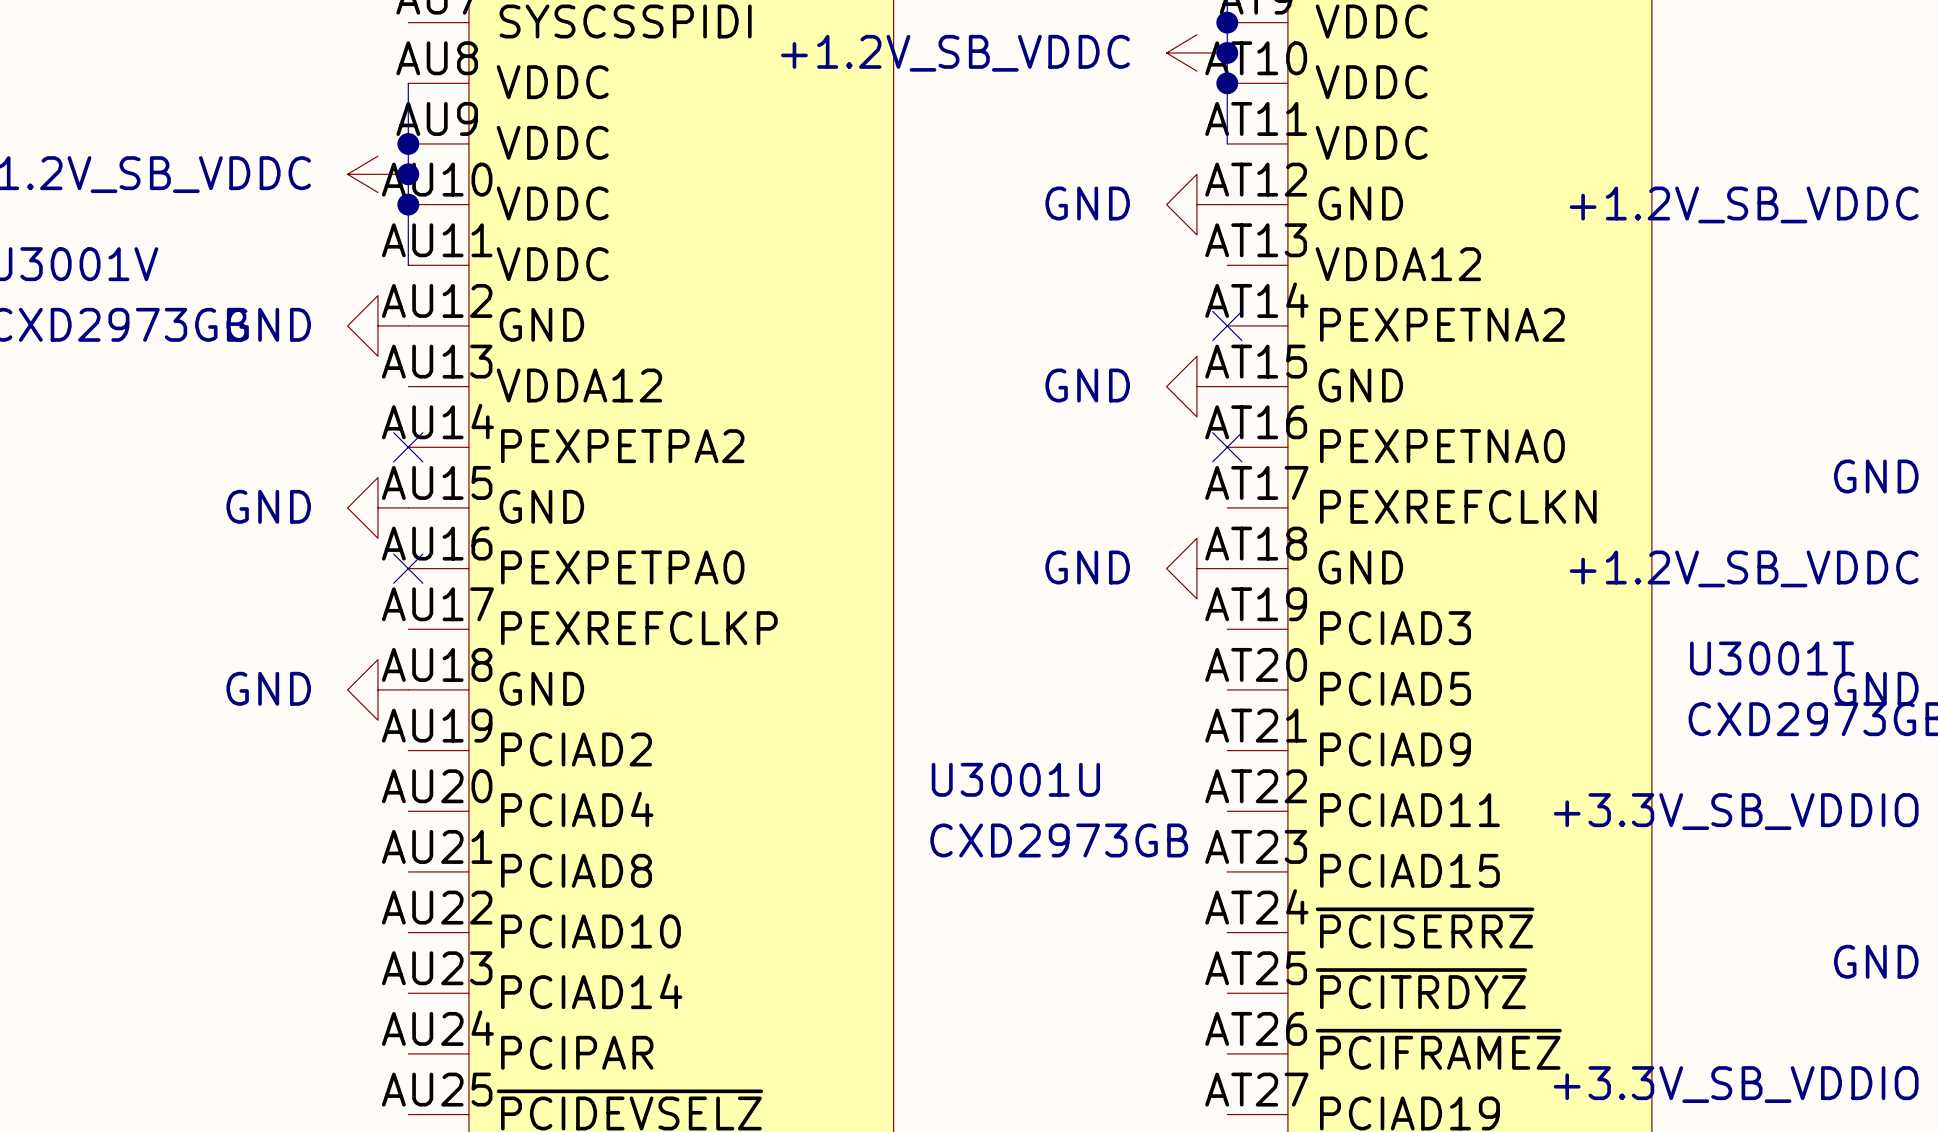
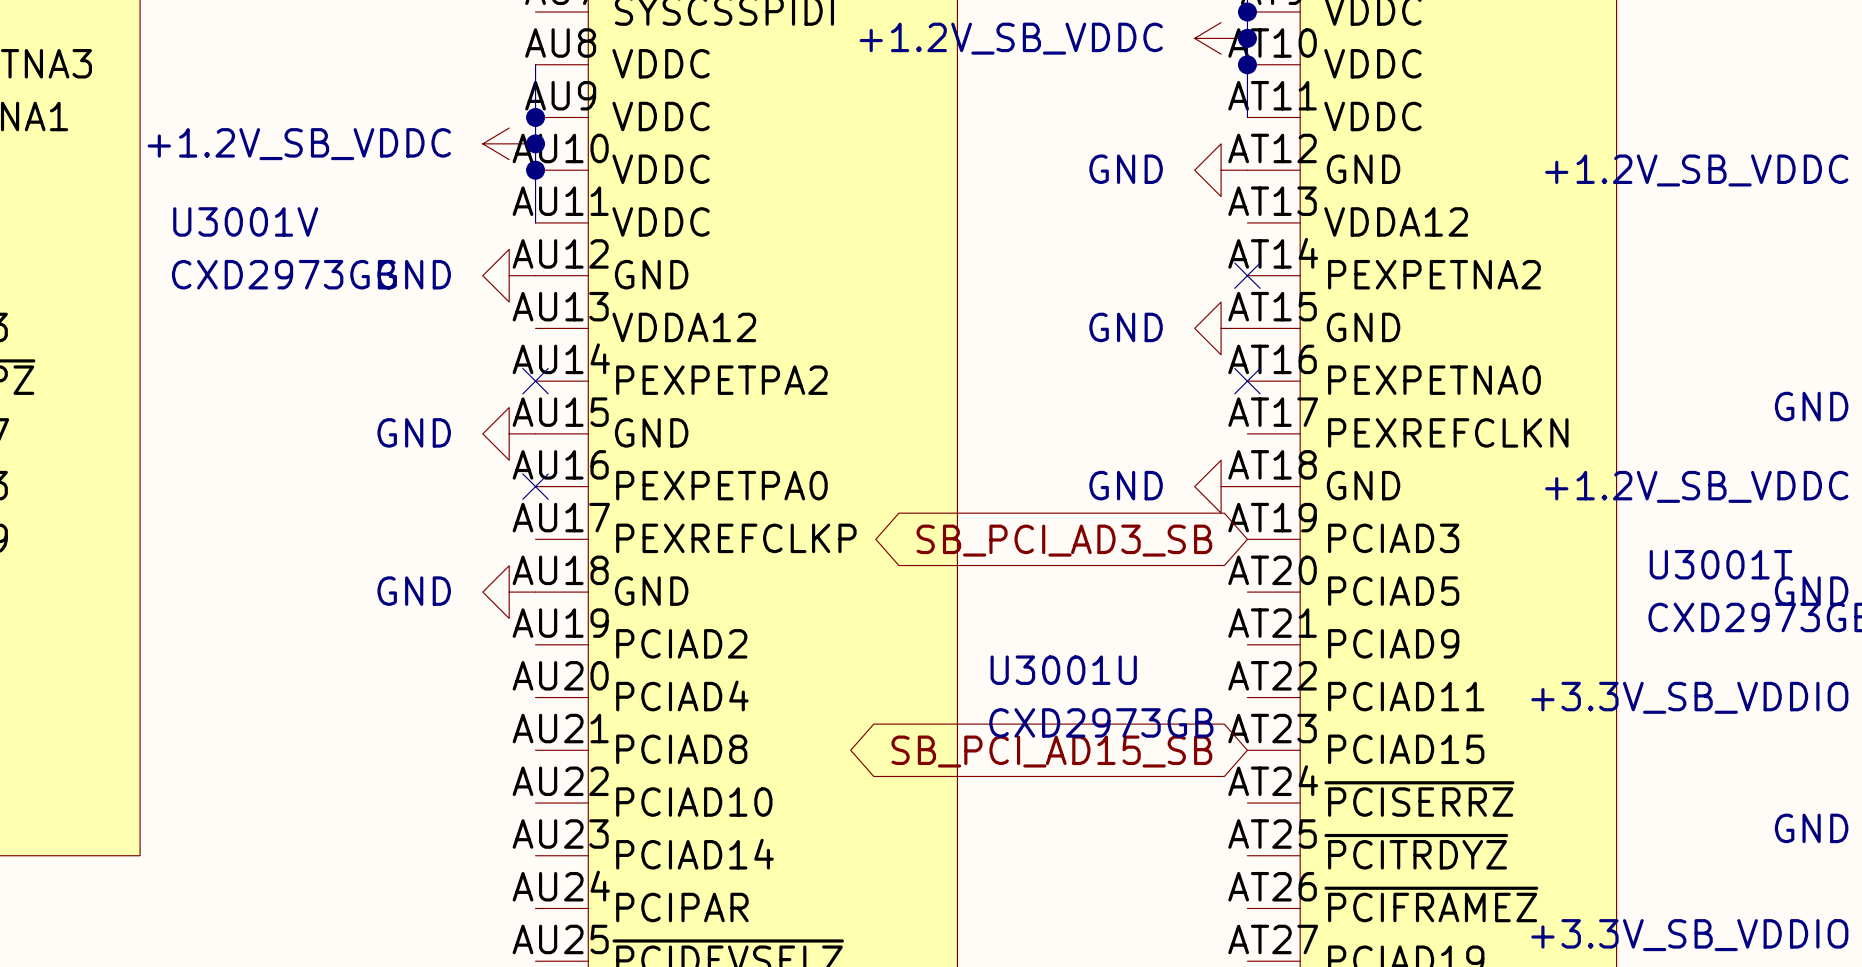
global label: none -> SB_PCI_AD3_SB (1064, 540)
global label: none -> SB_PCI_AD15_SB (1051, 751)

